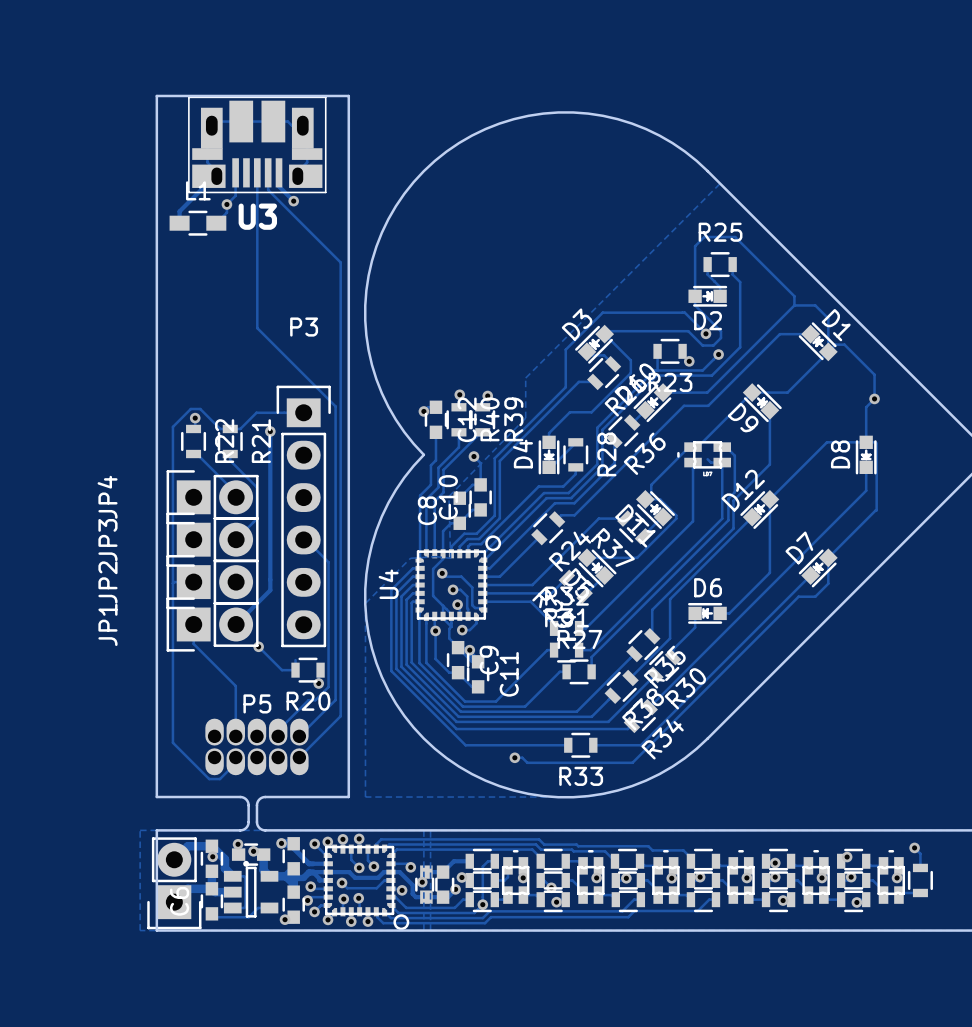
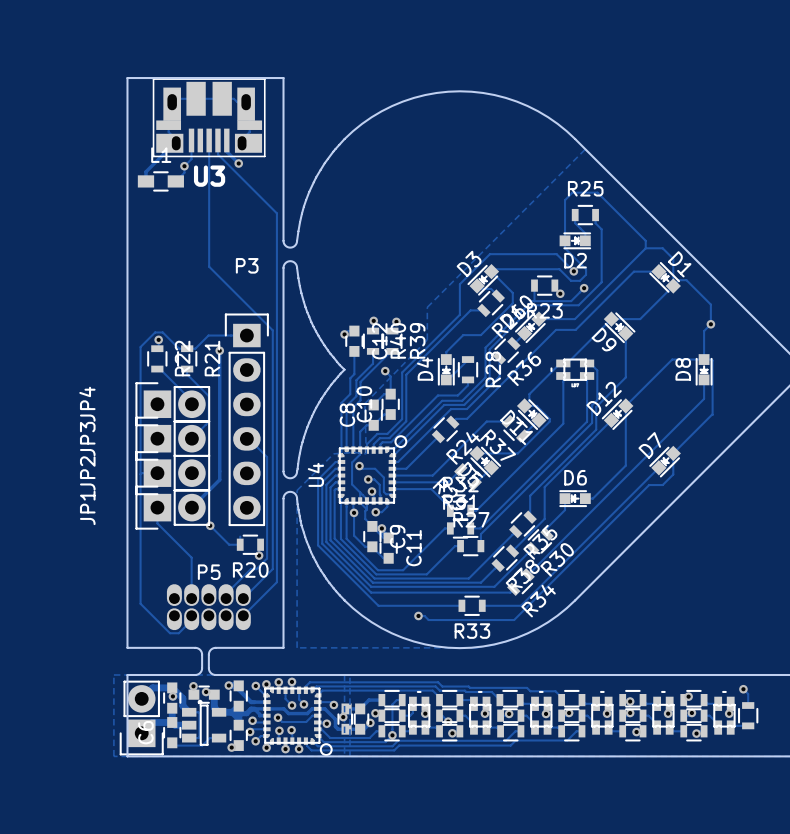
board edge: (707, 171) (684, 151) (659, 135) (632, 123) (603, 115) (573, 112) (543, 113) (499, 123) (472, 135) (446, 151) (423, 171) (404, 193) (388, 219) (376, 246) (368, 275) (365, 305) (366, 335) (376, 379) (395, 419) (423, 454) (395, 489) (381, 516) (371, 544) (366, 574) (366, 619) (371, 648) (388, 690) (404, 715) (434, 748) (459, 766) (499, 786) (543, 796) (588, 796) (632, 786) (672, 766) (707, 738) -> (575, 139) (557, 123) (538, 111) (516, 101) (494, 95) (471, 91) (448, 91) (425, 95) (402, 101) (381, 111) (362, 123) (335, 149) (324, 163) (309, 191) (301, 213) (296, 244) (288, 247) (283, 240)
board edge: (348, 296) (348, 329) -> (283, 471) (288, 478) (296, 474) (302, 442) (311, 416) (324, 393) (344, 369) (328, 350) (311, 322) (301, 293) (296, 264) (288, 261) (283, 267)
track: (707, 459) (710, 462) (722, 462) -> none
board edge: (348, 580) (348, 613) -> (575, 600) (557, 615) (538, 628) (516, 637) (494, 644) (471, 647) (448, 647) (425, 644) (402, 637) (381, 628) (362, 615) (336, 591) (320, 570) (311, 552) (301, 525) (296, 495) (288, 492) (283, 498)

